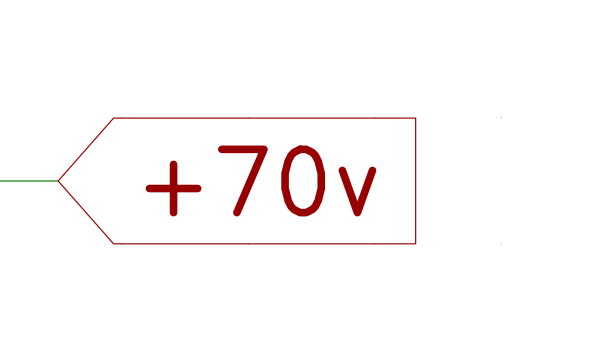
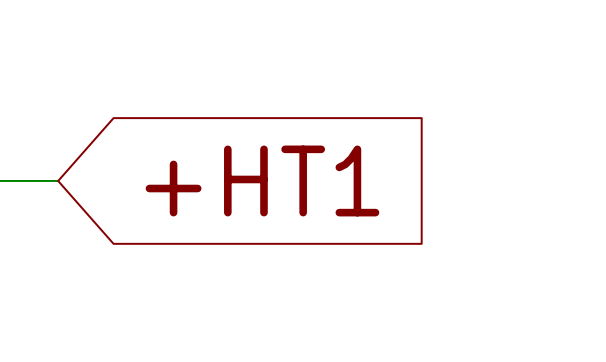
global label: +70v (260, 180) -> +HT1 (262, 180)

